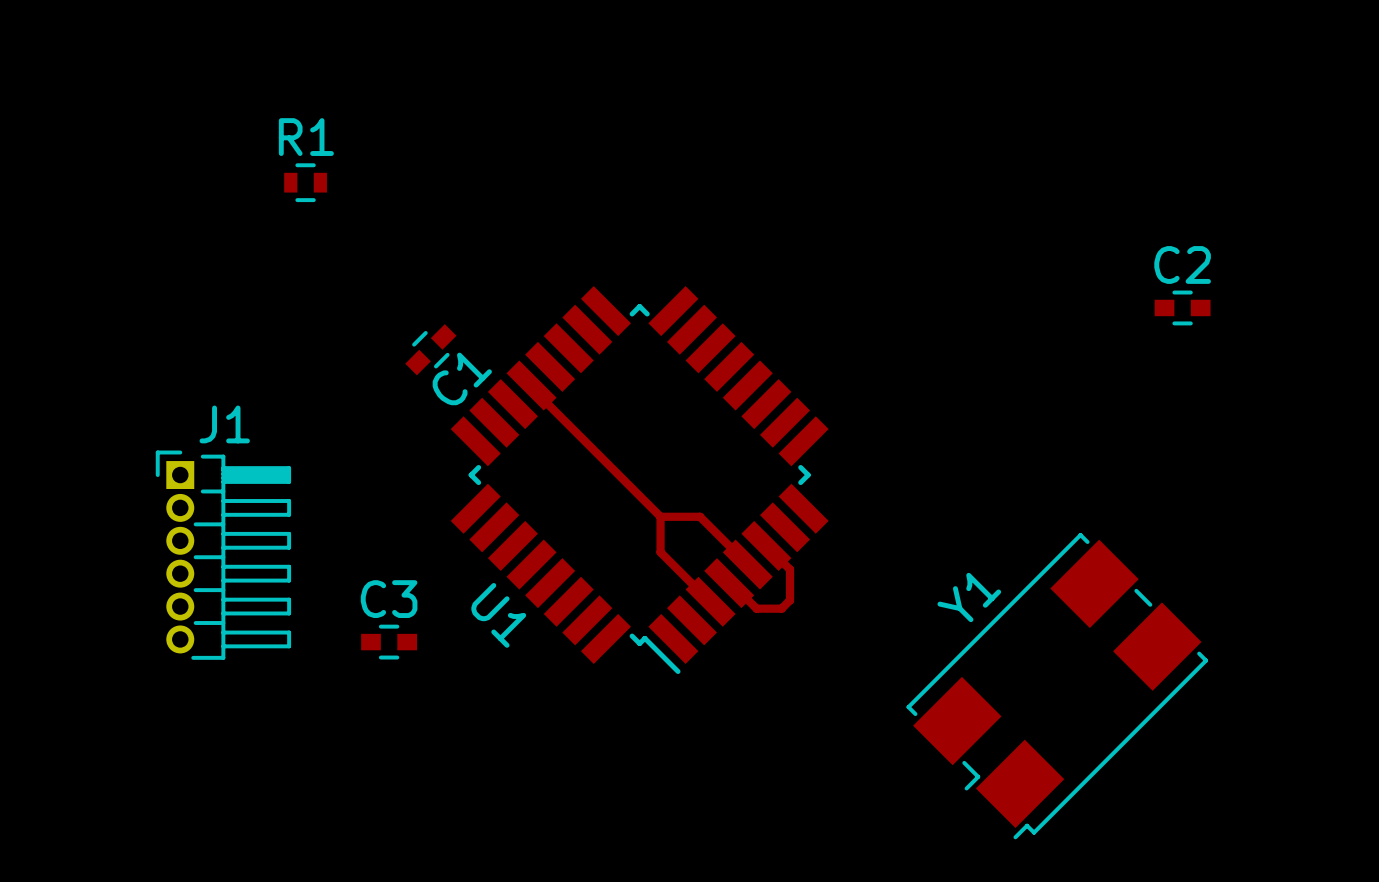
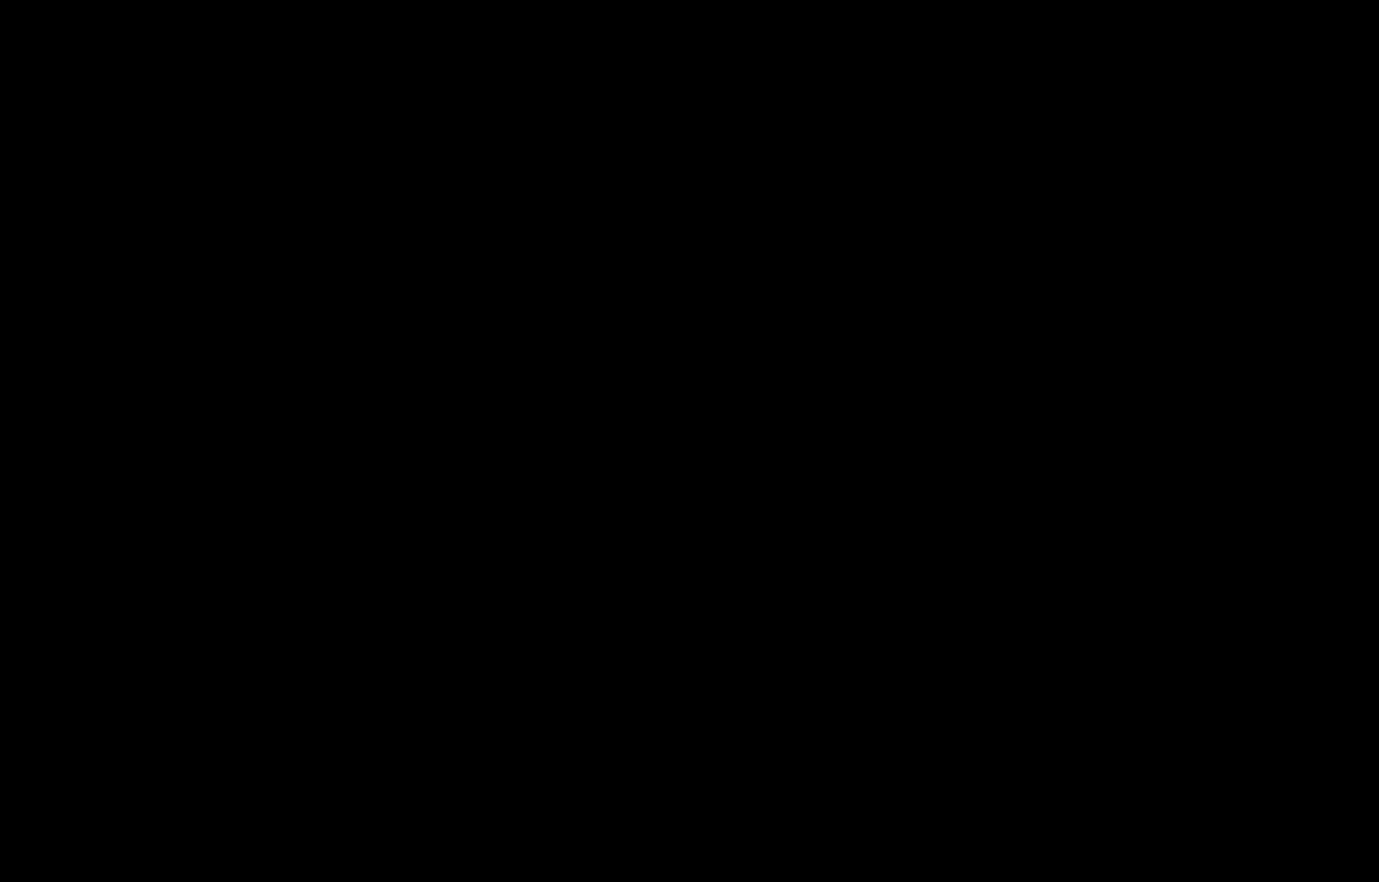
R1: (305, 182) -> none
C2: (1182, 307) -> none
C1: (430, 349) -> none
track: (531, 385) (531, 387) (660, 516) -> none
U1: (639, 480) -> none
track: (660, 516) (660, 552) (710, 601) -> none
track: (660, 516) (700, 516) (747, 564) -> none
track: (766, 545) (790, 569) (790, 600) (781, 608) (756, 608) (729, 583) -> none
J1: (223, 555) -> none
C3: (389, 642) -> none
Y1: (1057, 686) -> none

